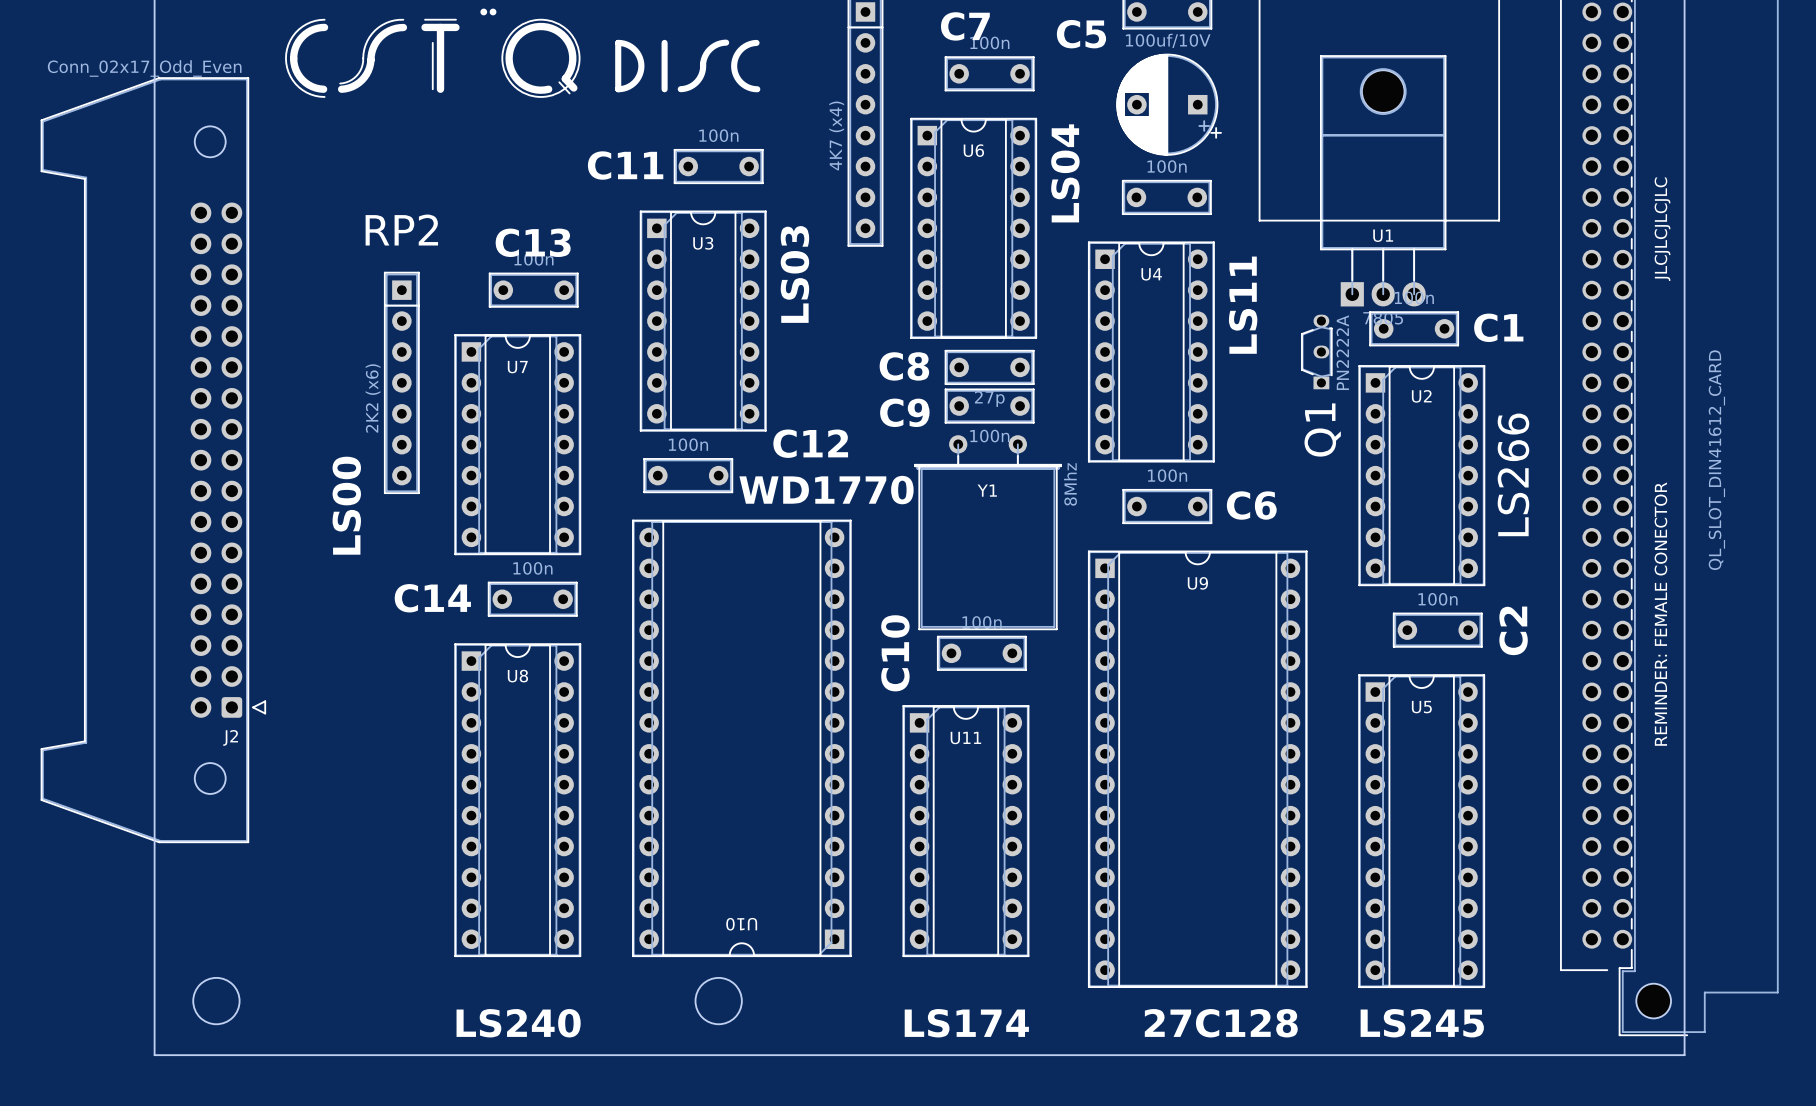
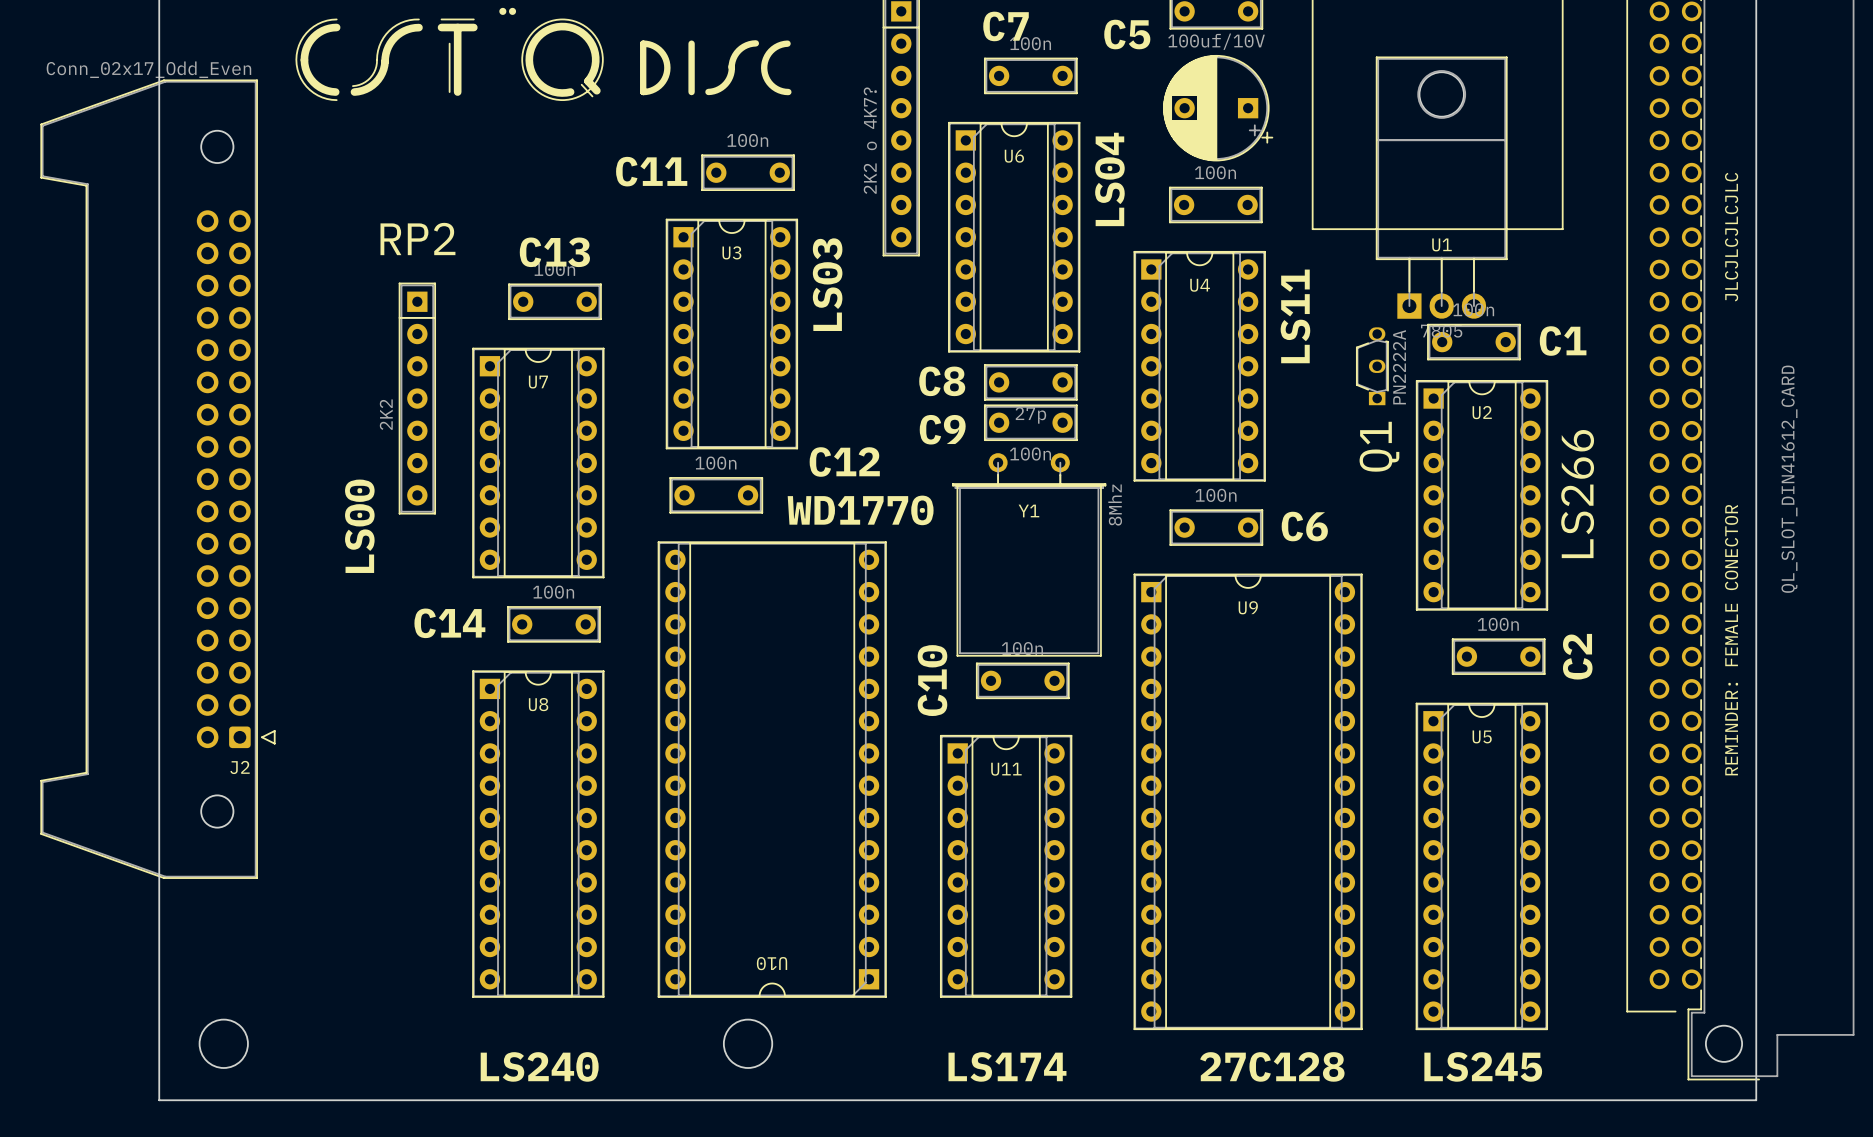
part value: 4K7 (x4) (836, 135) -> 2K2 o 4K7? (870, 140)
RP2 value: 2K2 (x6) (373, 398) -> 2K2 (386, 414)

